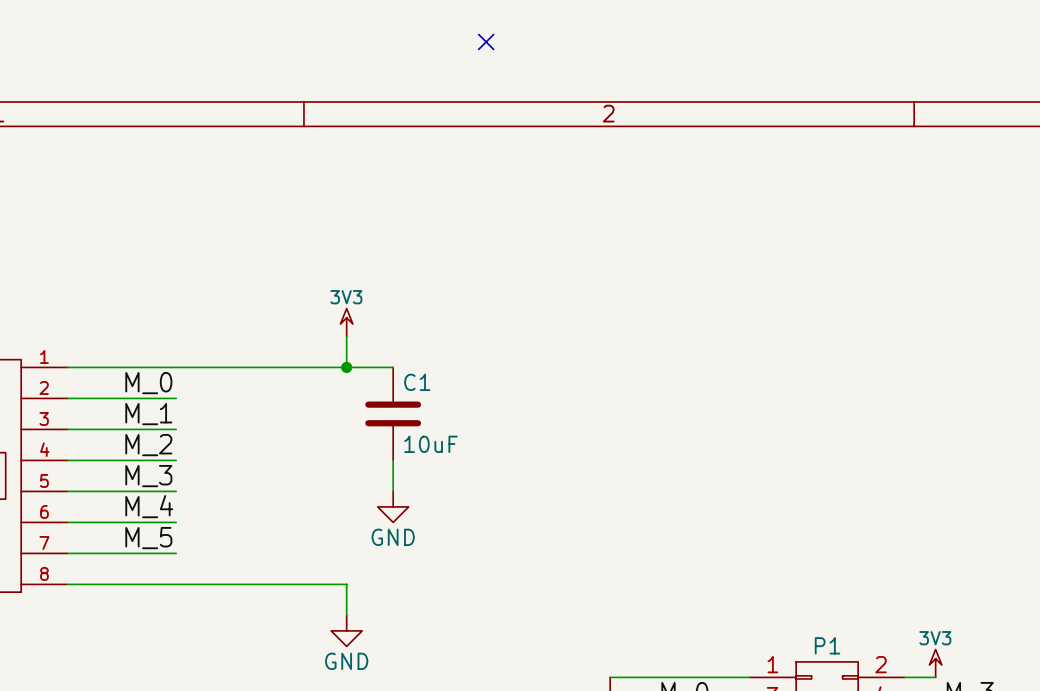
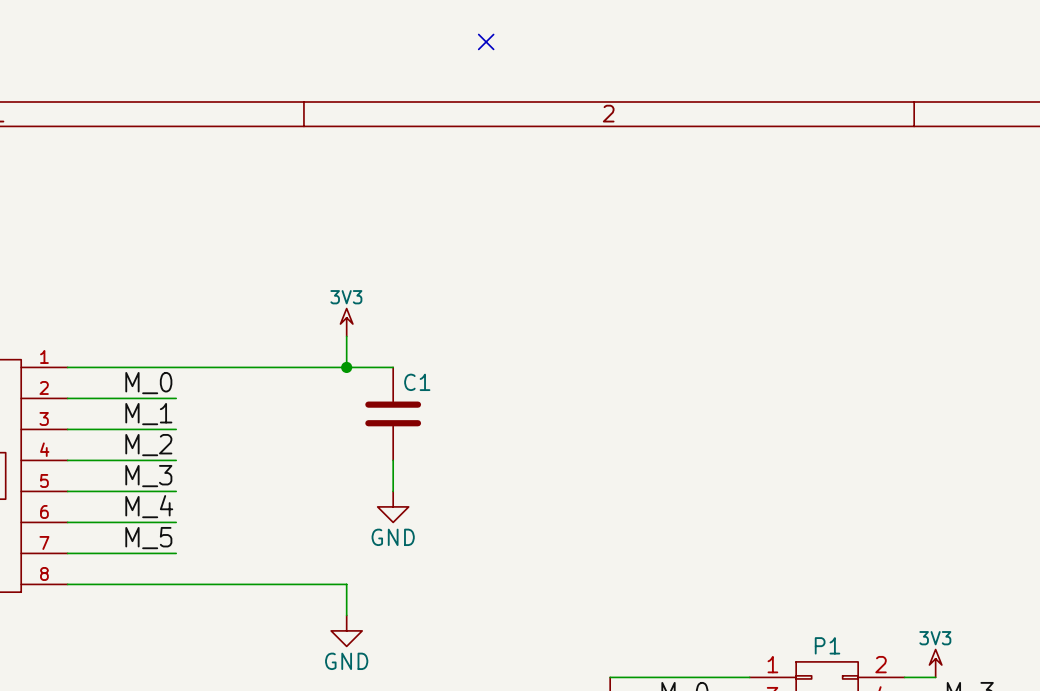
C1 value: 10uF (430, 444) -> none

